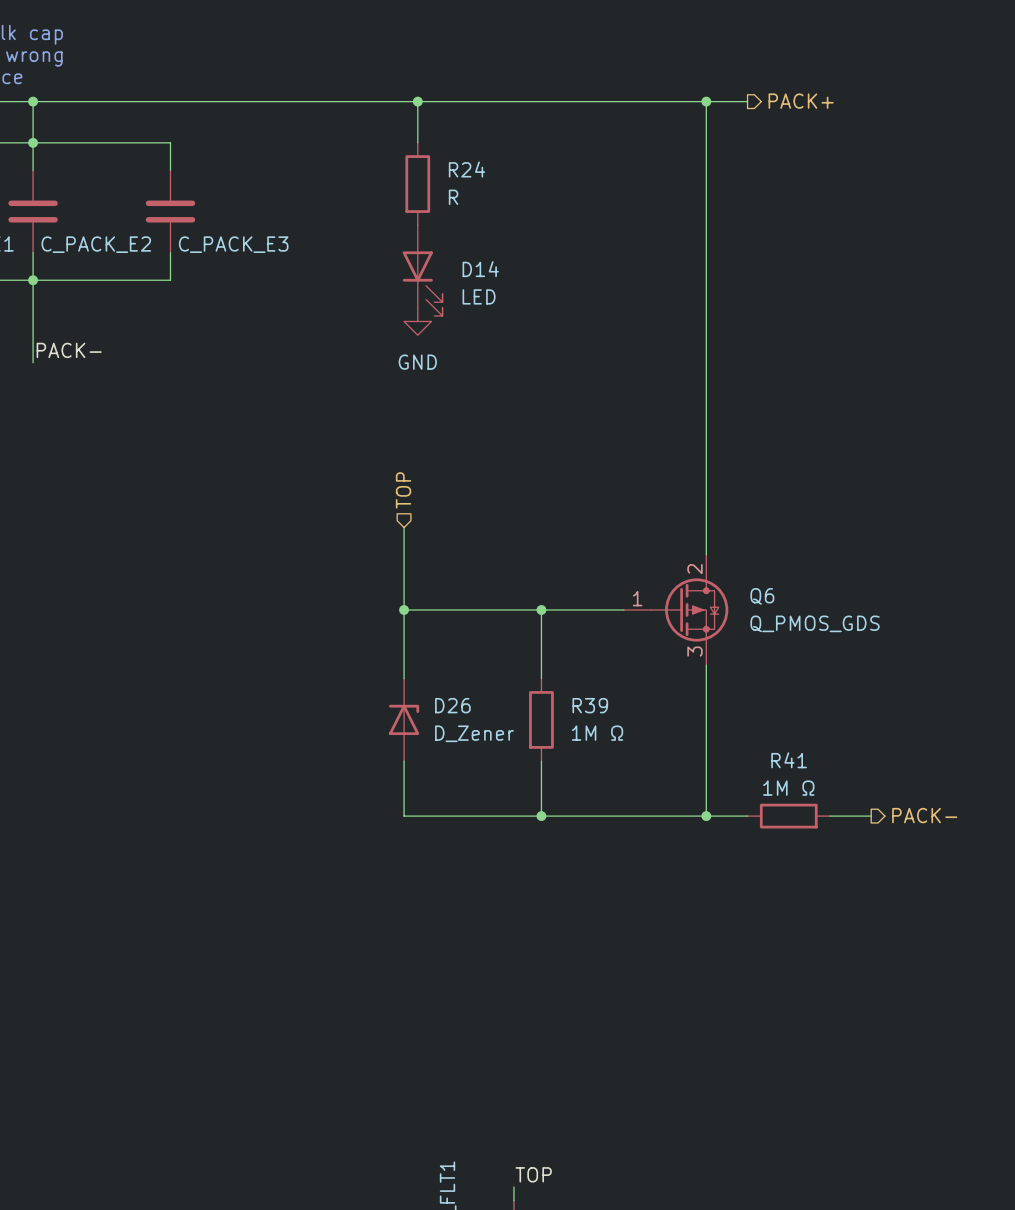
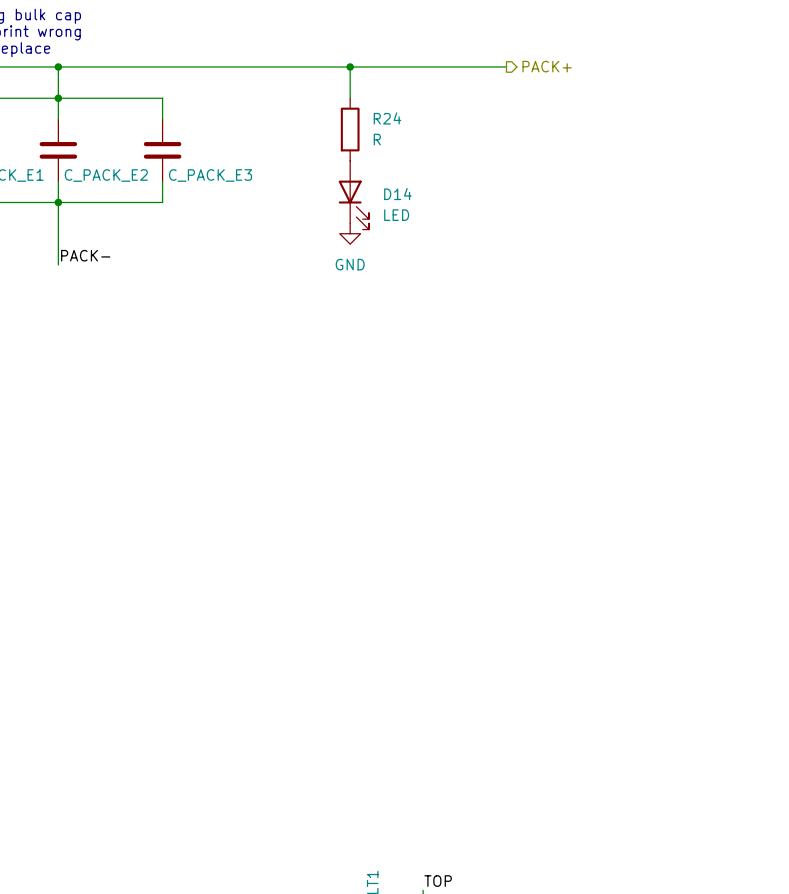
wire: (623, 101) (747, 101) -> none
wire: (706, 101) (706, 555) -> none
junction: (706, 101) -> none
hierarchical label position: PACK+ (801, 101) -> PACK+ (547, 66)
hierarchical label: TOP (403, 490) -> none
wire: (404, 527) (404, 678) -> none
wire: (404, 609) (623, 609) -> none
junction: (404, 609) -> none
wire: (541, 609) (541, 678) -> none
junction: (541, 609) -> none
Q6: Q_PMOS_GDS (676, 609) -> none
wire: (706, 664) (706, 816) -> none
D26: D_Zener (404, 719) -> none
R39: 1M Ω (541, 719) -> none
wire: (404, 761) (404, 816) (747, 816) -> none
wire: (541, 761) (541, 816) -> none
hierarchical label: PACK- (924, 815) -> none
junction: (541, 816) -> none
junction: (706, 816) -> none
R41: 1M Ω (788, 816) -> none
wire: (829, 816) (871, 816) -> none

